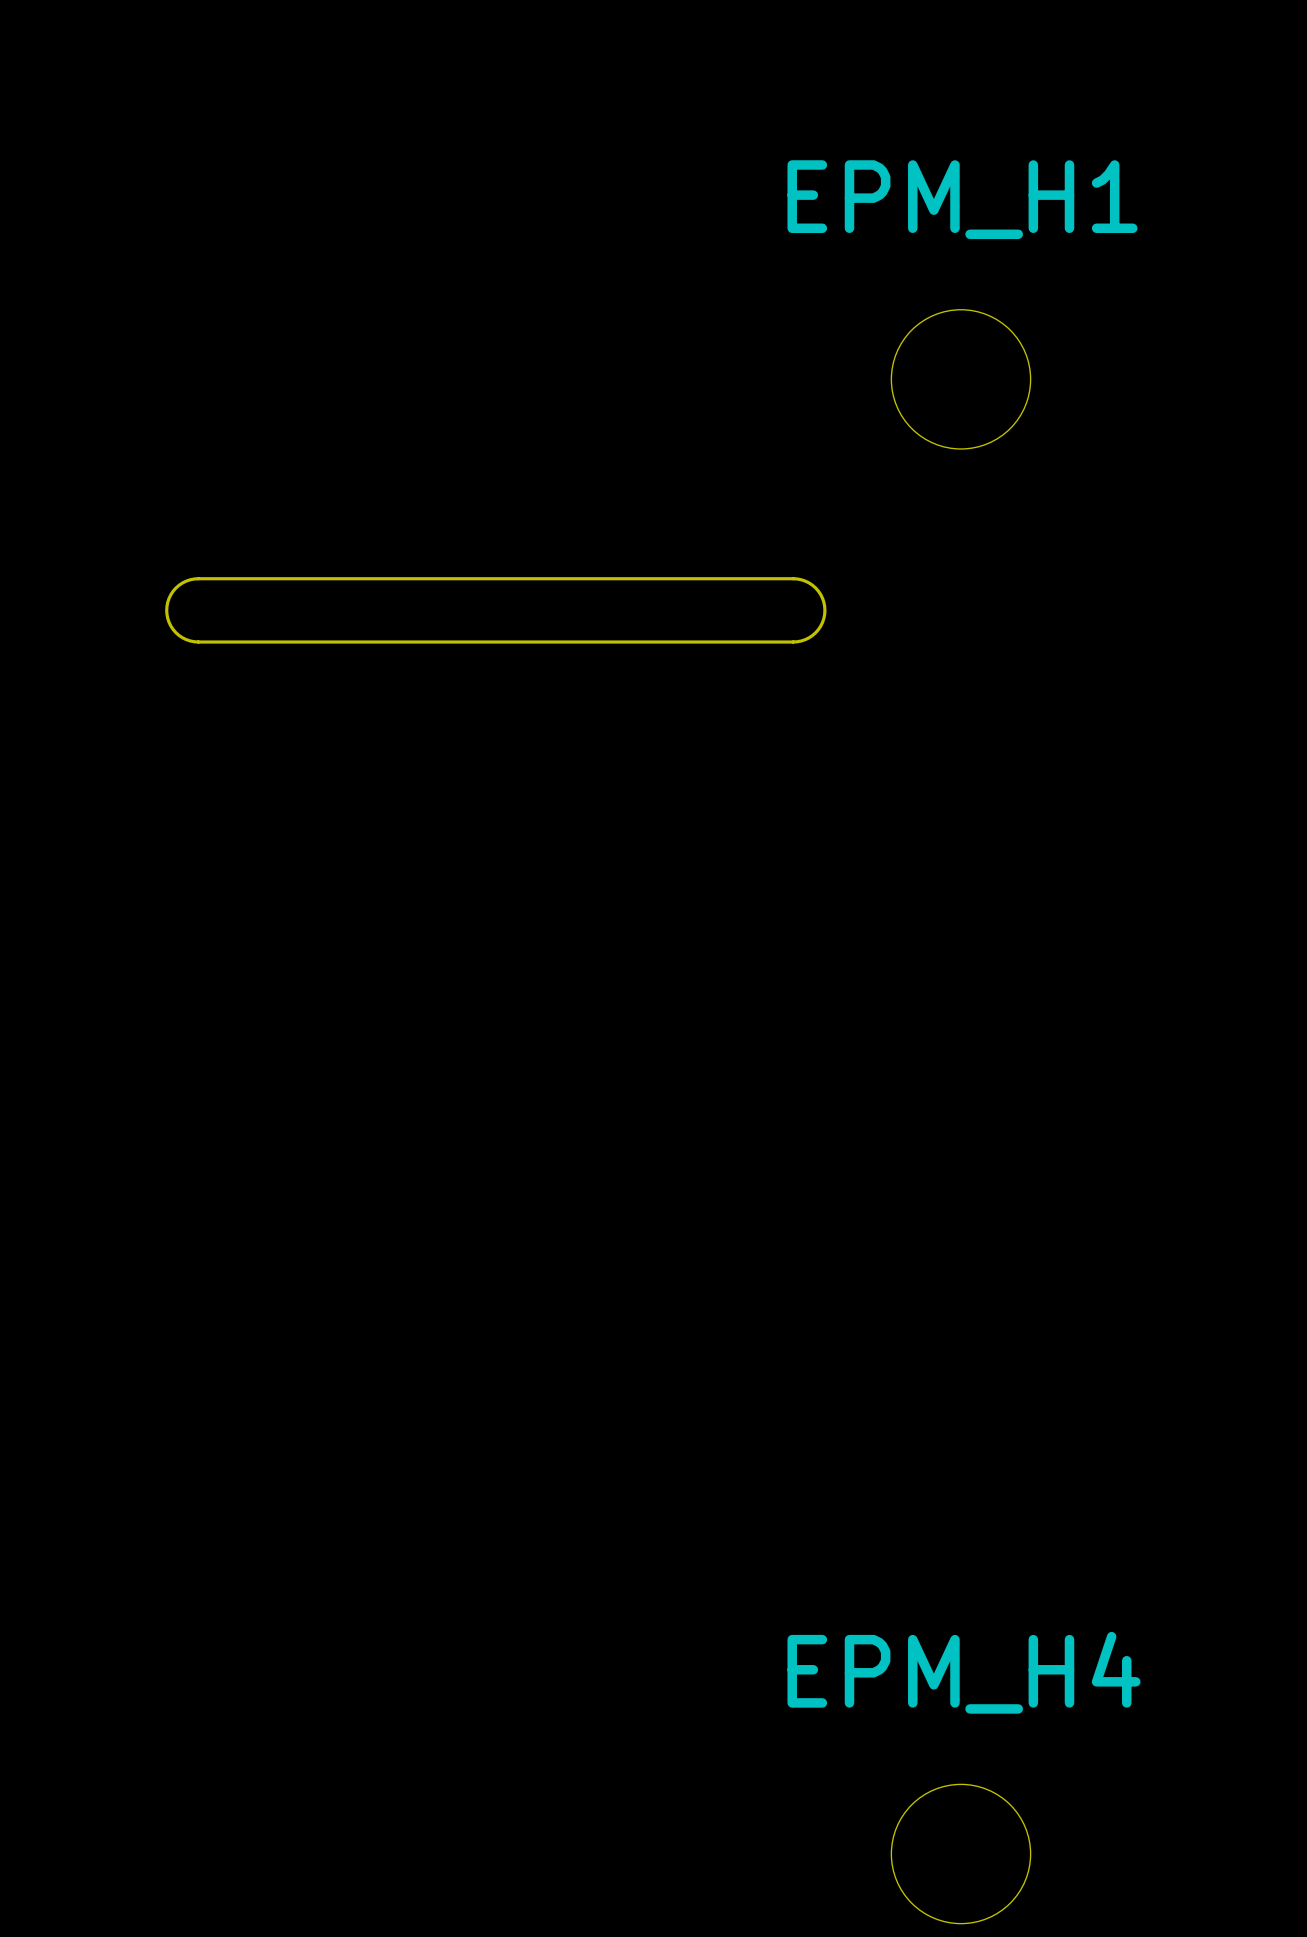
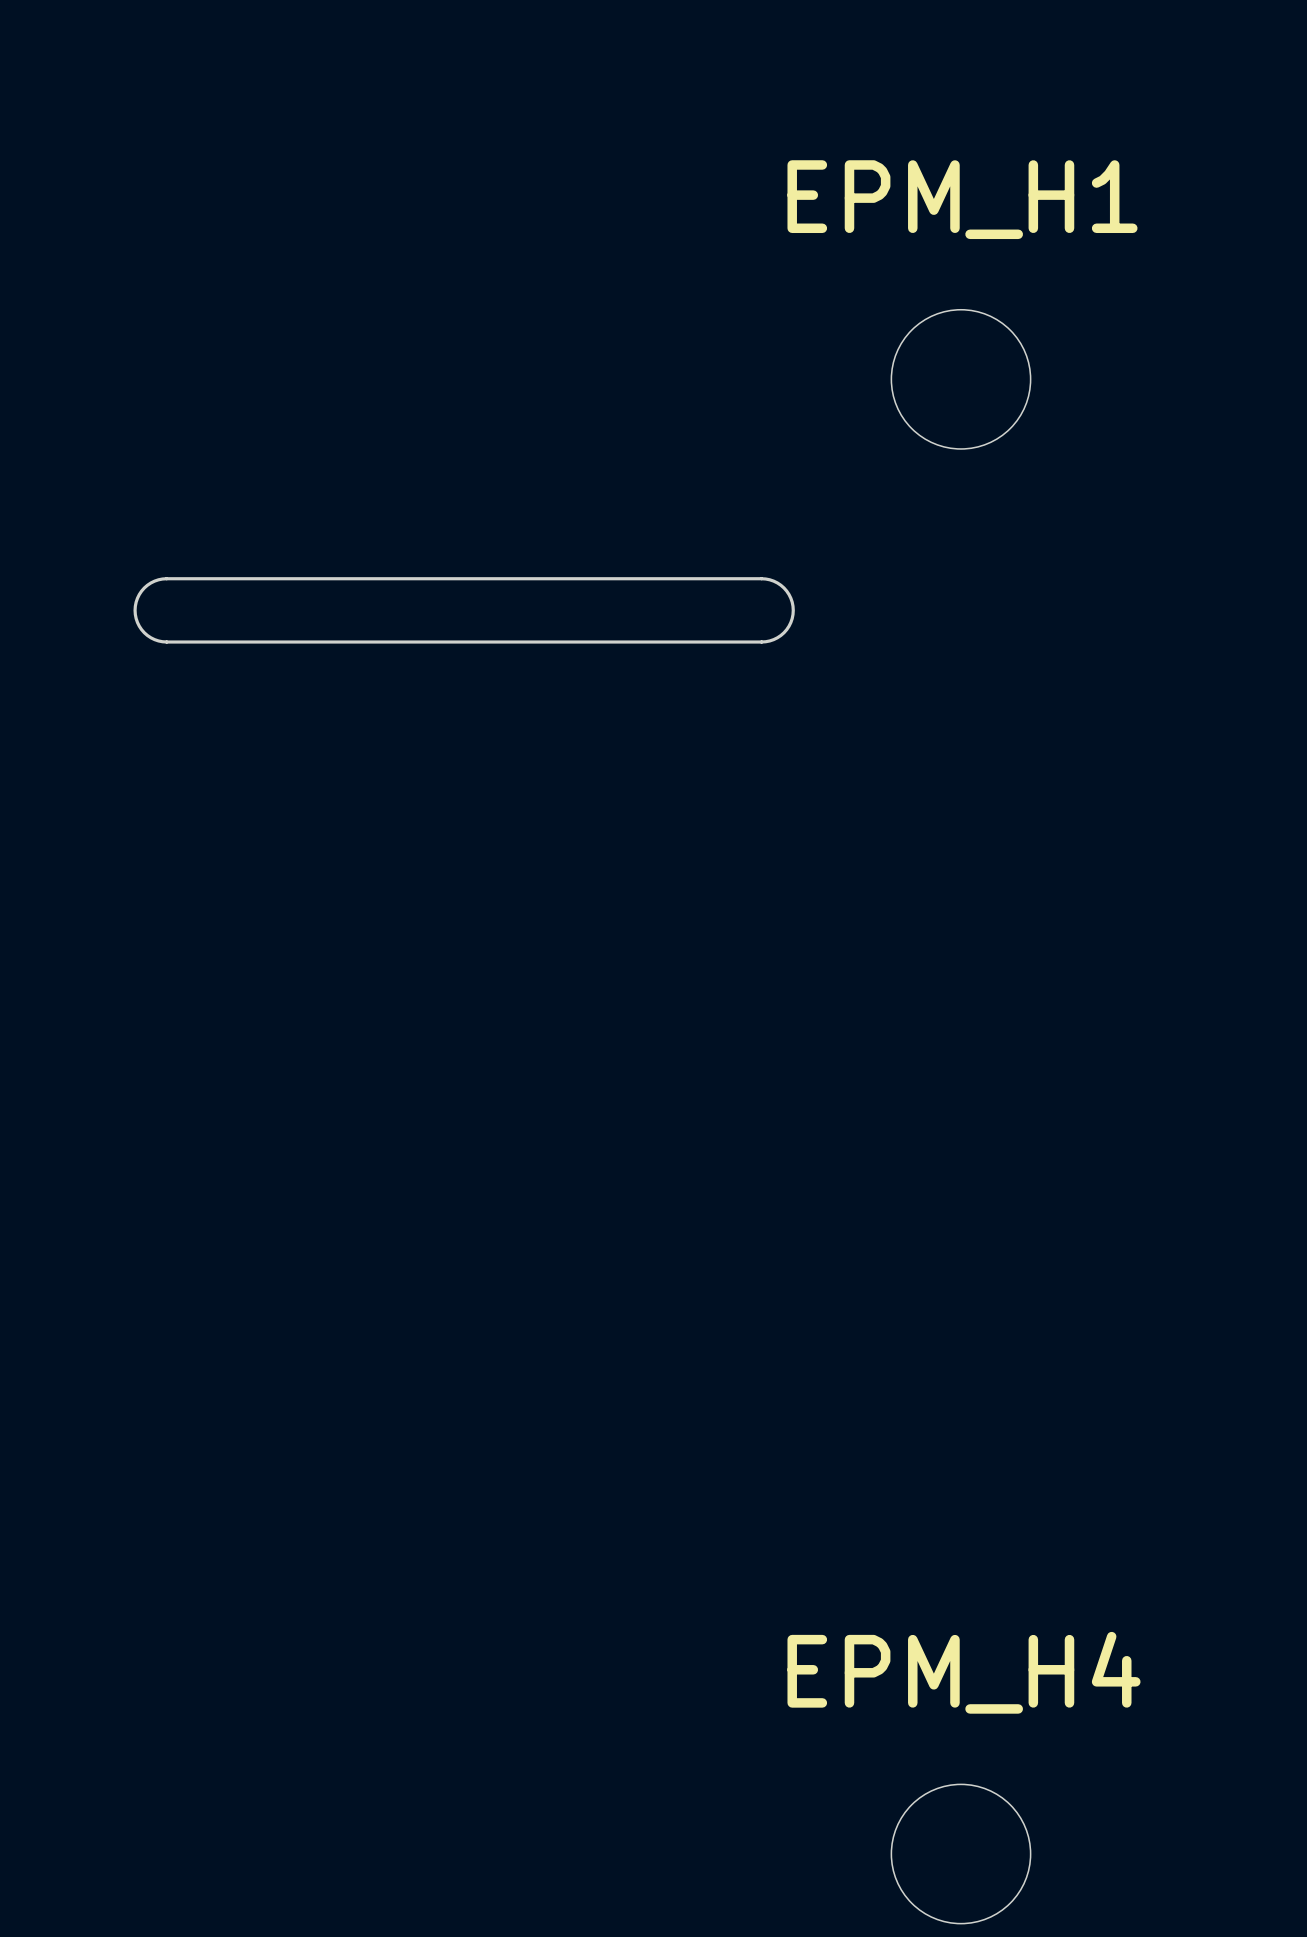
drawing position: (495, 610) -> (464, 610)

